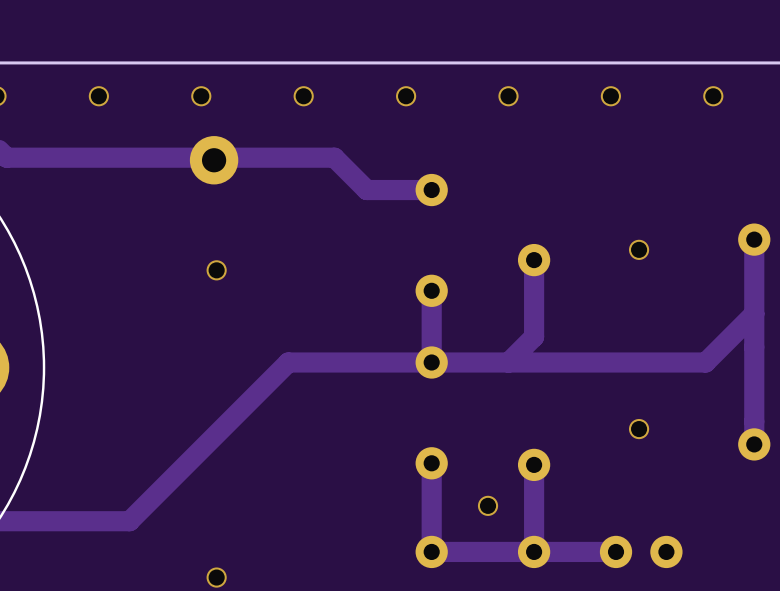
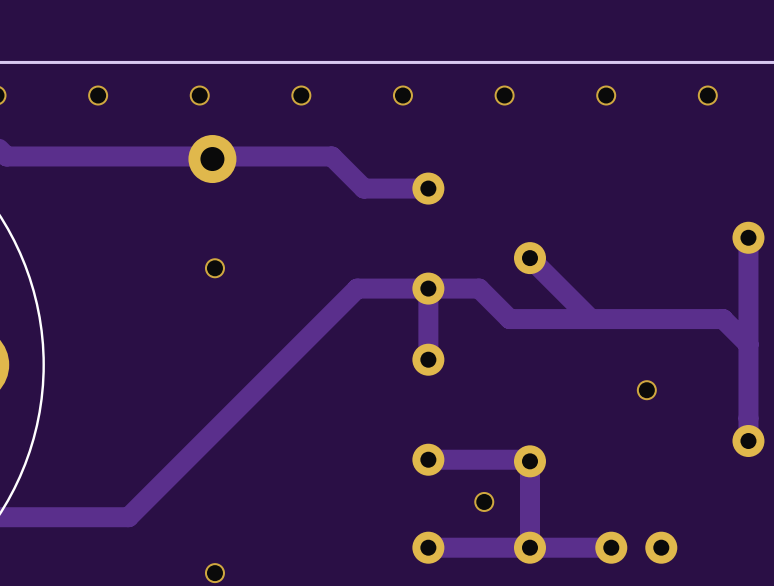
via: (639, 249) -> none
track: (534, 260) (534, 336) (508, 362) -> (529, 258) (590, 319)
track: (754, 313) (705, 362) (288, 362) -> (748, 344) (723, 319) (509, 319) (479, 288) (357, 288) (286, 359)
via position: (639, 429) -> (646, 390)
track: (431, 463) (431, 551) -> (428, 459) (528, 459)

